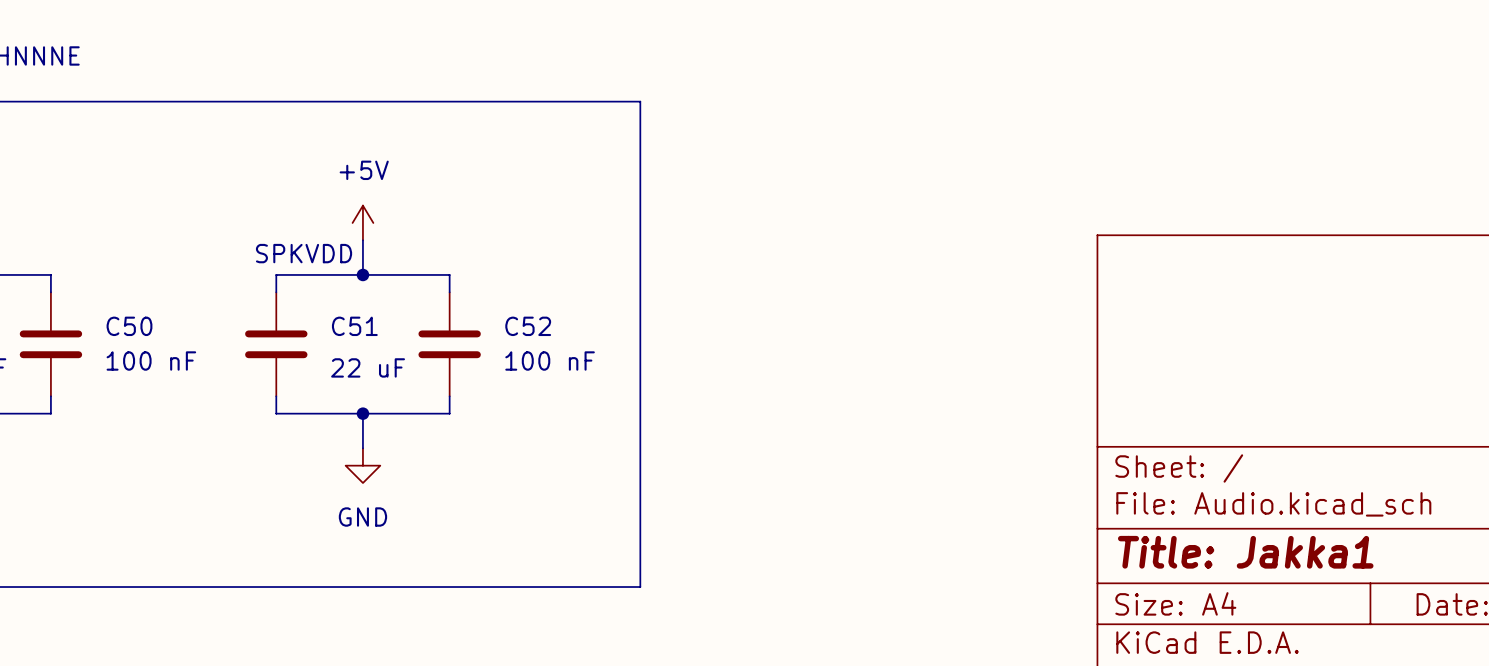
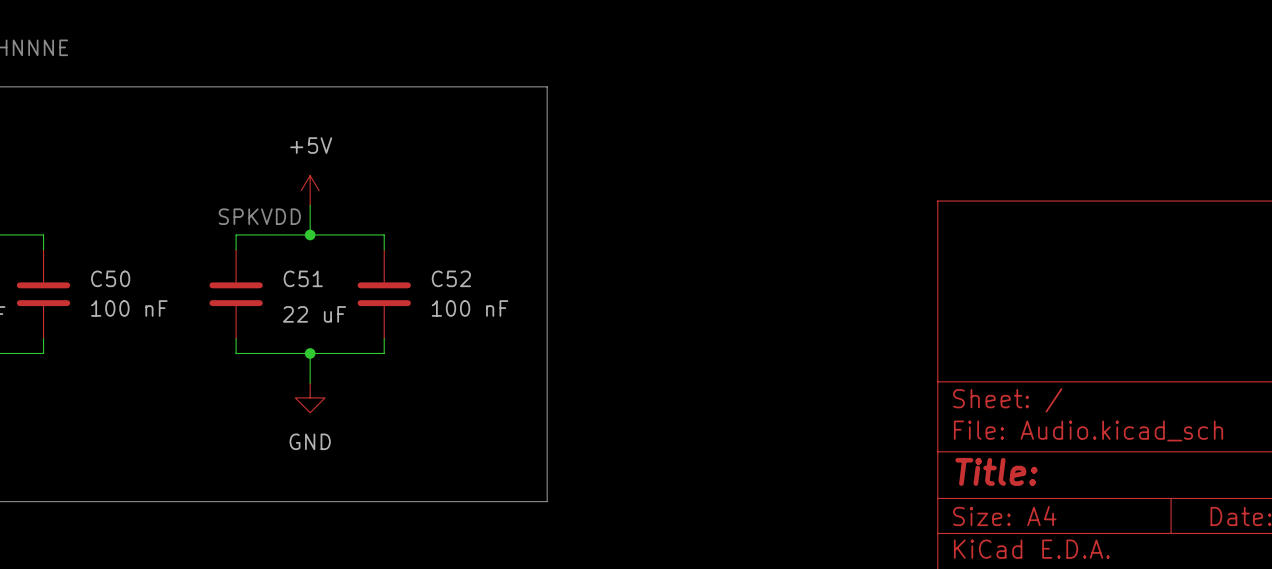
title block: Title: Jakka1 (1245, 552) -> Title: (996, 471)

